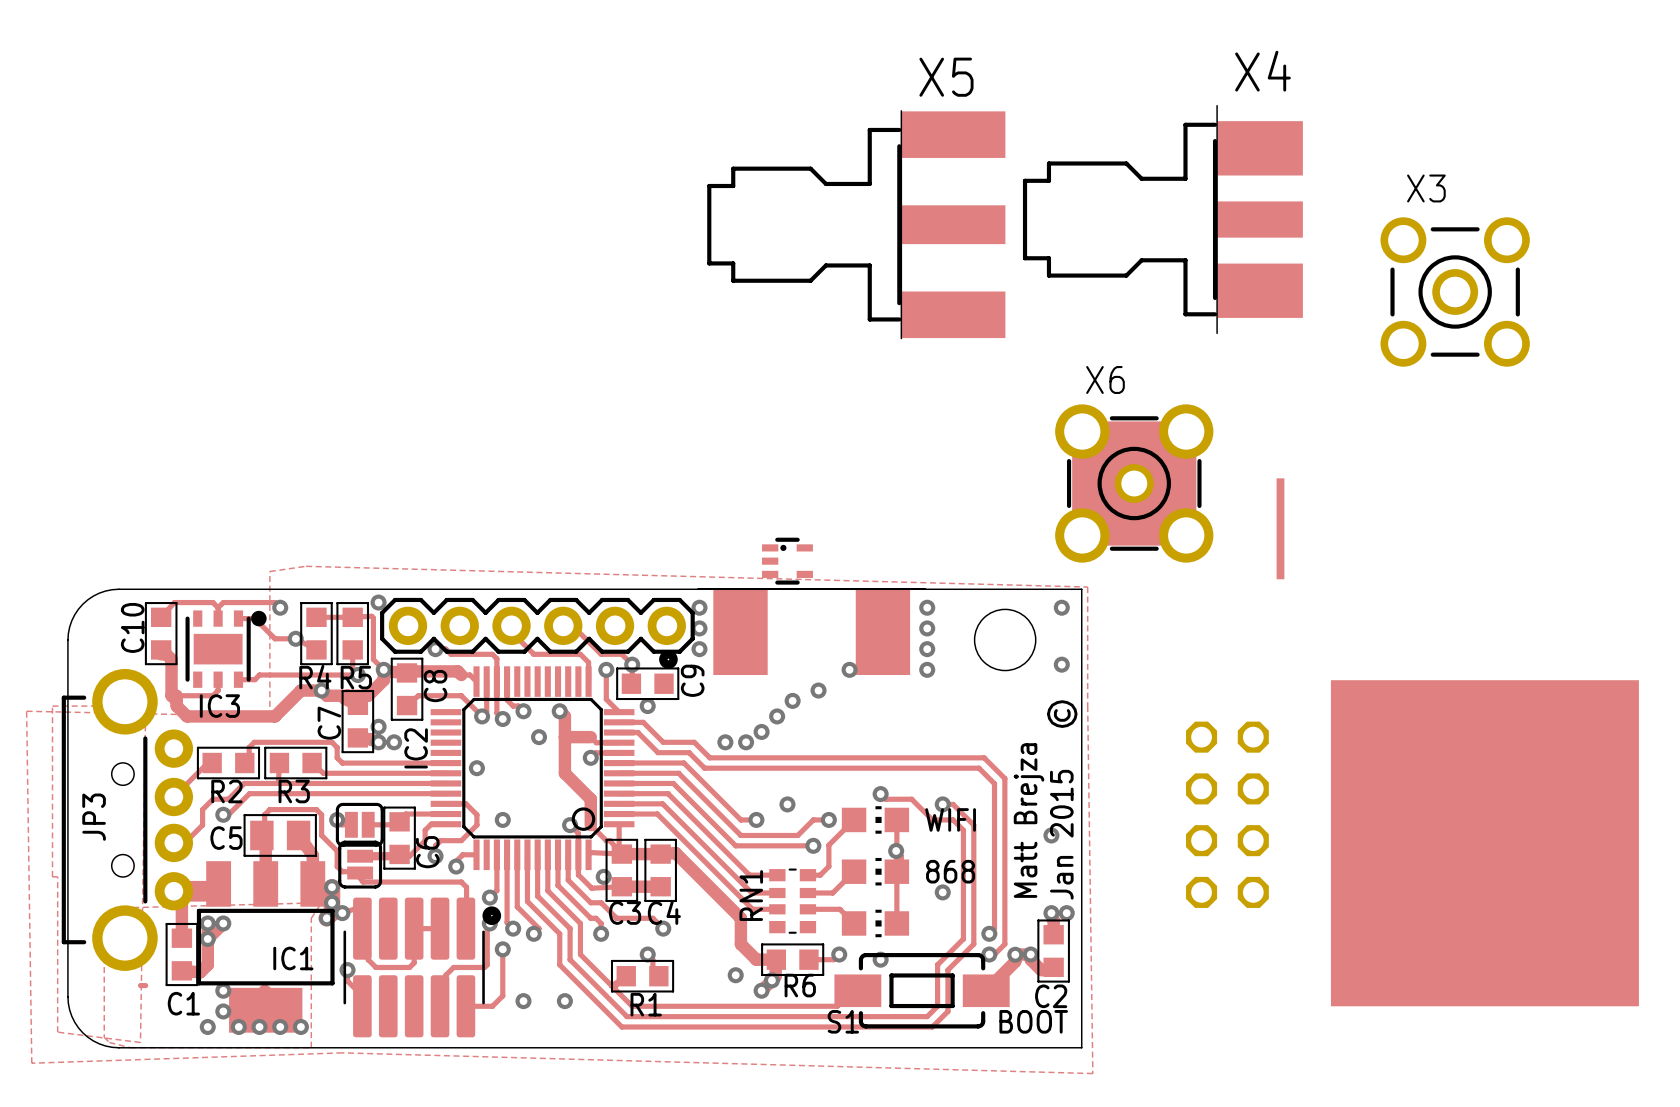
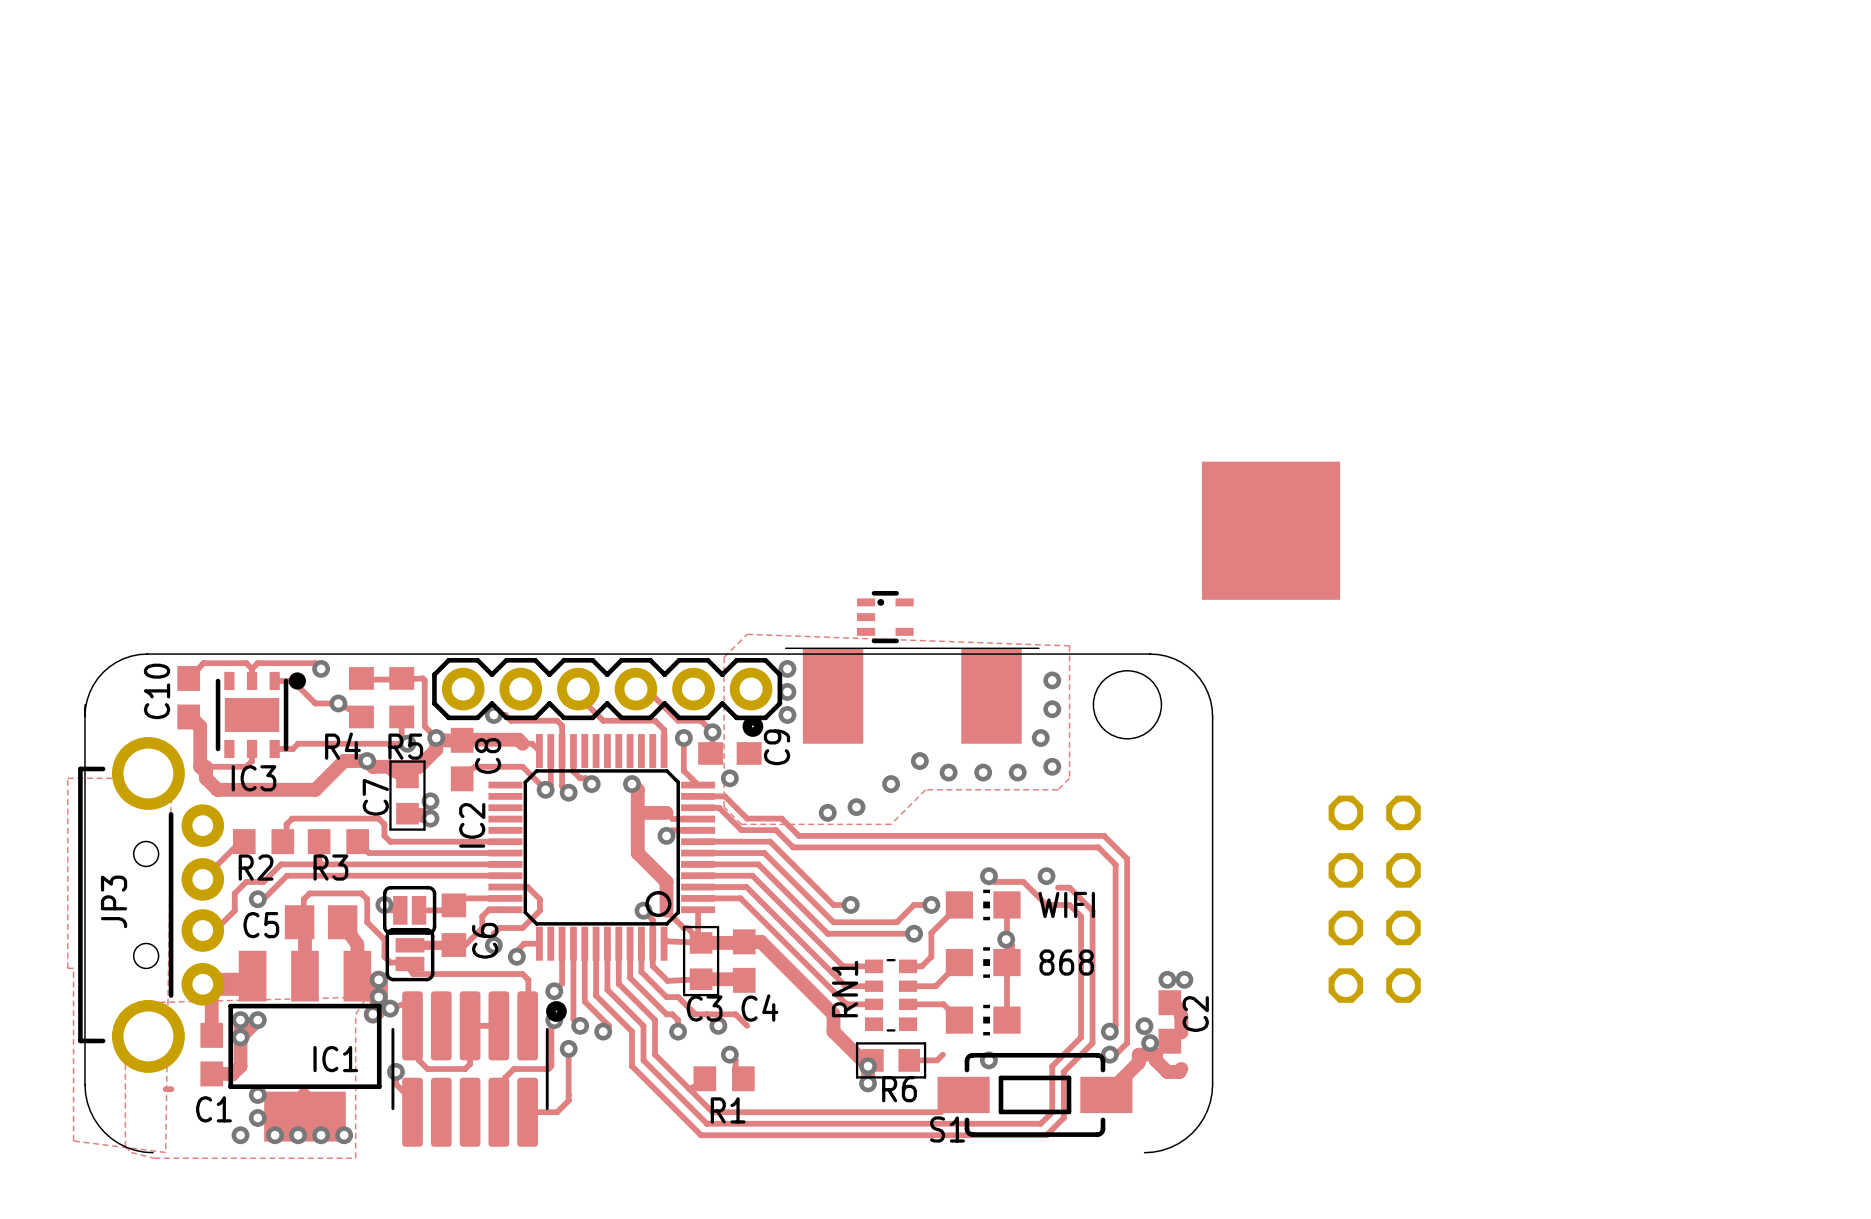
X4: (1162, 219) -> none
X5: (856, 224) -> none
X3: (1455, 292) -> none
drawing: [1276, 478, 1285, 580] -> none
X6: (1134, 483) -> none
zone outline: (306, 566) (269, 571) (269, 716) (26, 711) (31, 1063) (342, 1052) (1092, 1073) (1087, 587) (306, 566) -> none
zone outline: none -> (747, 634) (724, 657) (724, 807) (741, 824) (891, 824) (925, 789) (1058, 789) (1069, 778) (1069, 645) (747, 634)
C10 footprint: [144, 602, 178, 666] -> [177, 665, 201, 730]
R4 footprint: [300, 602, 333, 666] -> [348, 667, 374, 729]
R5 footprint: [336, 602, 370, 666] -> [389, 667, 415, 729]
via: (378, 602) -> none
via: (927, 607) -> none
via: (1061, 607) -> none
via: none -> (1052, 680)
via: (927, 628) -> none
board edge: (67, 640) (71, 620) (82, 604) (99, 593) (118, 589) (1081, 589) (1081, 650) -> (84, 716) (89, 692) (103, 672) (123, 658) (147, 654) (1150, 654) (1174, 658) (1194, 672) (1207, 692) (1212, 716)
via: none -> (1052, 709)
via: (927, 649) -> none
C8 footprint: [390, 657, 424, 721] -> [450, 727, 474, 792]
via: (1061, 664) -> none
C9 footprint: [616, 667, 680, 701] -> [698, 742, 762, 765]
via: (849, 669) -> none
drawing: [1330, 680, 1639, 1007] -> none
via: none -> (1052, 766)
via: (792, 700) -> none
via: none -> (948, 772)
via: none -> (983, 772)
via: none -> (1017, 772)
via: none -> (891, 784)
text: © (1062, 714) -> none
via: (777, 716) -> none
via: (539, 737) -> none
via: none -> (827, 812)
via: (394, 742) -> none
via: (725, 742) -> none
via: (746, 742) -> none
R2 footprint: [196, 746, 261, 780] -> [232, 829, 295, 855]
R3 footprint: [264, 746, 328, 780] -> [307, 829, 369, 855]
via: (476, 768) -> none
via: (787, 804) -> none
via position: (942, 804) -> (1046, 876)
C6 footprint: [383, 806, 416, 870] -> [441, 893, 467, 957]
C5 footprint: [243, 814, 317, 857] -> [284, 905, 358, 940]
via: (502, 819) -> none
text: Matt Brejza (1029, 820) -> none
text: Jan 2015 (1061, 834) -> none
via: (1051, 835) -> none
C4 footprint: [644, 838, 677, 902] -> [732, 929, 756, 993]
via: (603, 876) -> none
via: none -> (1167, 979)
via: none -> (1184, 979)
via: (942, 892) -> none
via: (1051, 913) -> none
via: (1066, 913) -> none
C2 footprint: [1037, 919, 1070, 983] -> [1158, 990, 1182, 1054]
C1 footprint: [165, 922, 199, 987] -> [200, 1022, 224, 1087]
via position: (663, 928) -> (718, 1025)
via: none -> (1144, 1026)
track: (740, 933) (740, 944) (756, 959) (776, 959) (775, 977) (761, 990) -> (833, 1031) (868, 1066) (868, 1083)
via: none -> (1150, 1043)
via: (839, 954) -> none
via: (1015, 954) -> none
via: (1030, 954) -> none
R1 footprint: [610, 959, 675, 993] -> [693, 1066, 755, 1092]
via: none -> (868, 1066)
via: (735, 975) -> none
board edge: (67, 981) (69, 1010) (78, 1027) (93, 1040) (105, 1046) (118, 1047) (1081, 1047) (1081, 981) -> (84, 1084) (90, 1110) (104, 1132) (126, 1147) (152, 1152)
board edge: none -> (1212, 1084) (1207, 1110) (1192, 1132) (1170, 1147) (1144, 1152)
via: (761, 990) -> none
C2 name position: C2 (1051, 996) -> C2 (1195, 1014)
via: (523, 1001) -> none
via: (564, 1001) -> none
text: BOOT (1033, 1021) -> none

